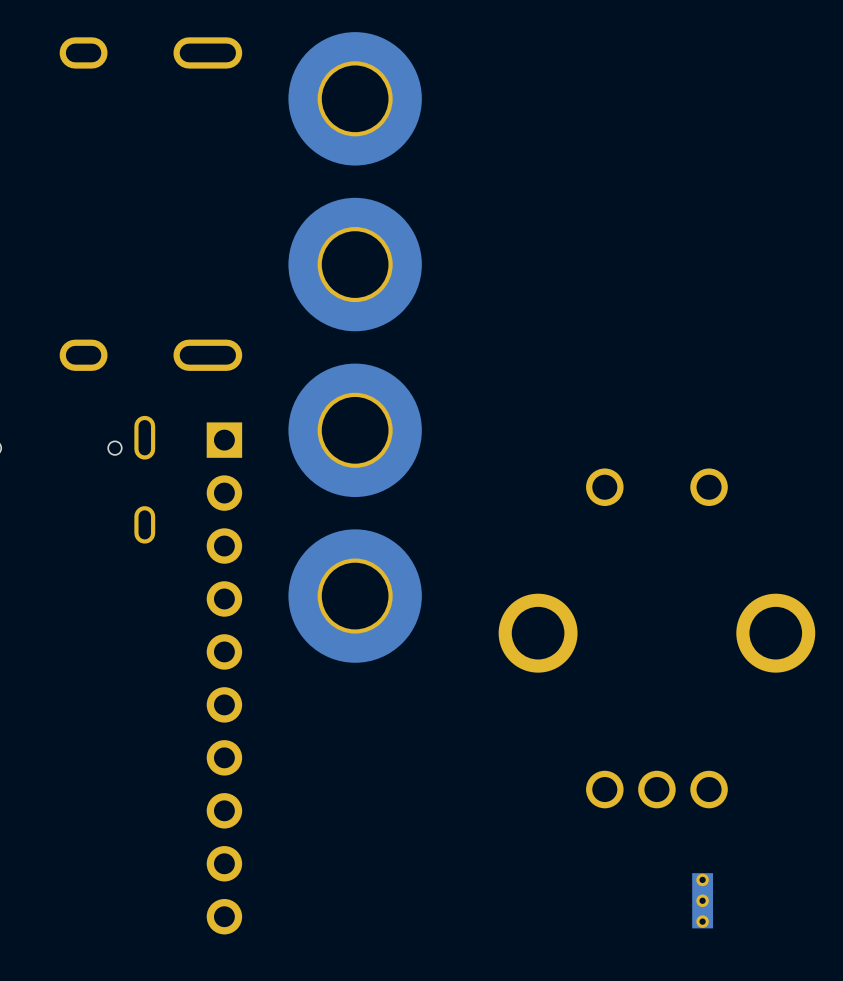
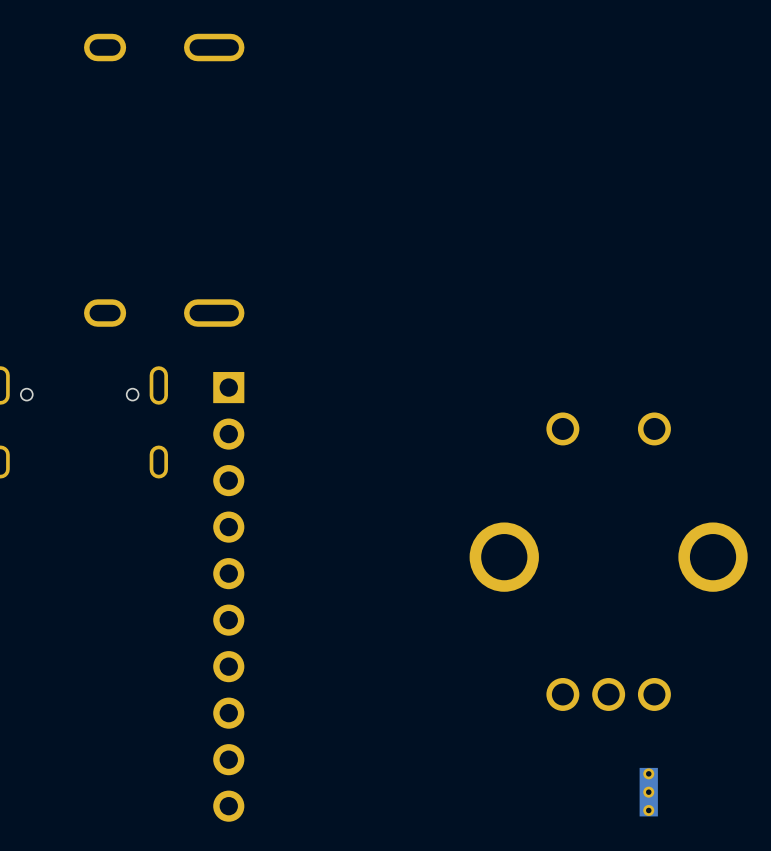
part: (355, 98) -> none
part: (355, 264) -> none
part: (355, 430) -> none
part: (355, 596) -> none

